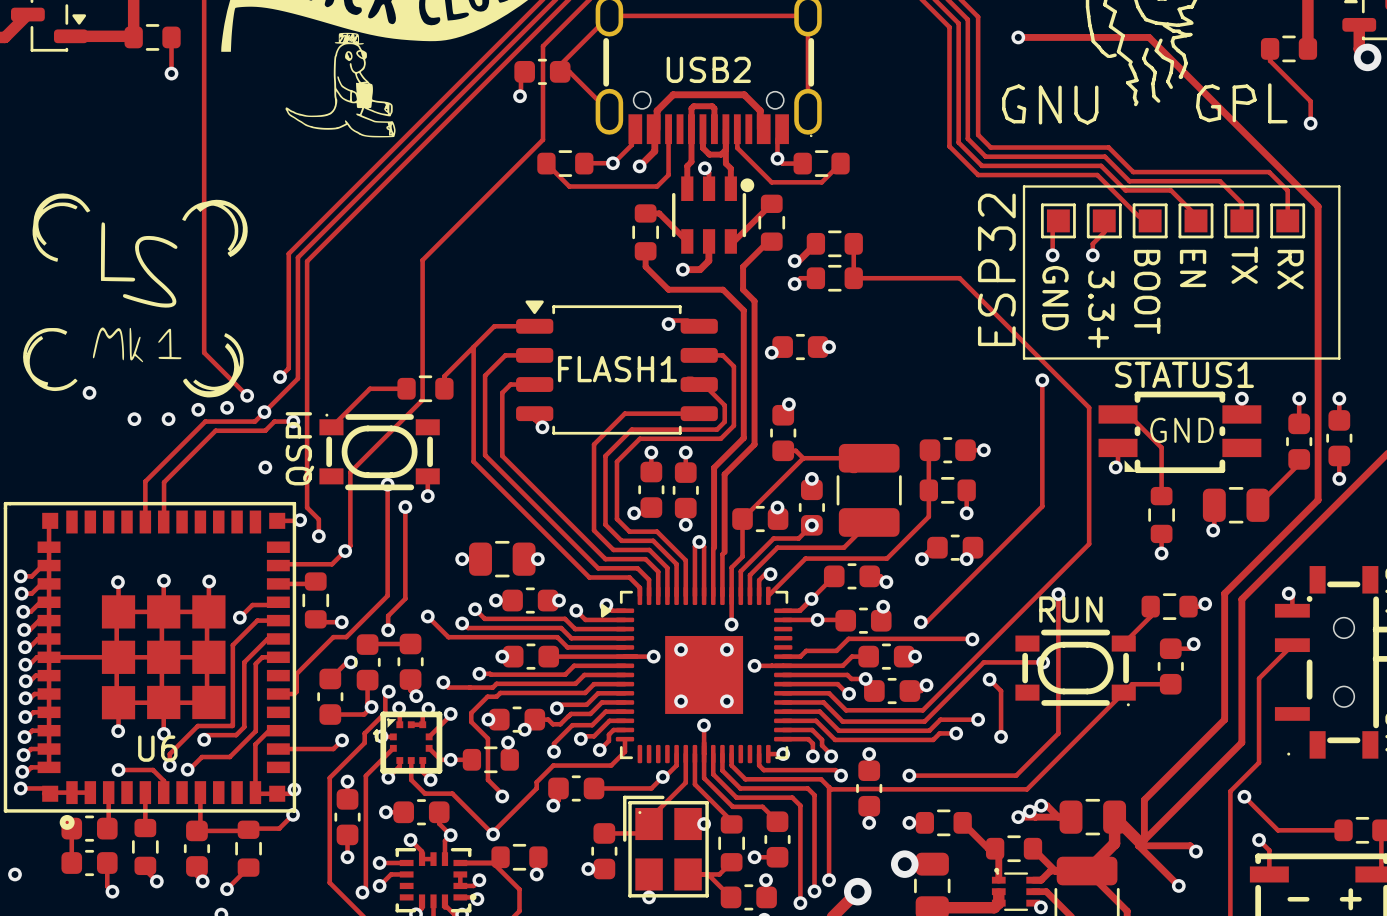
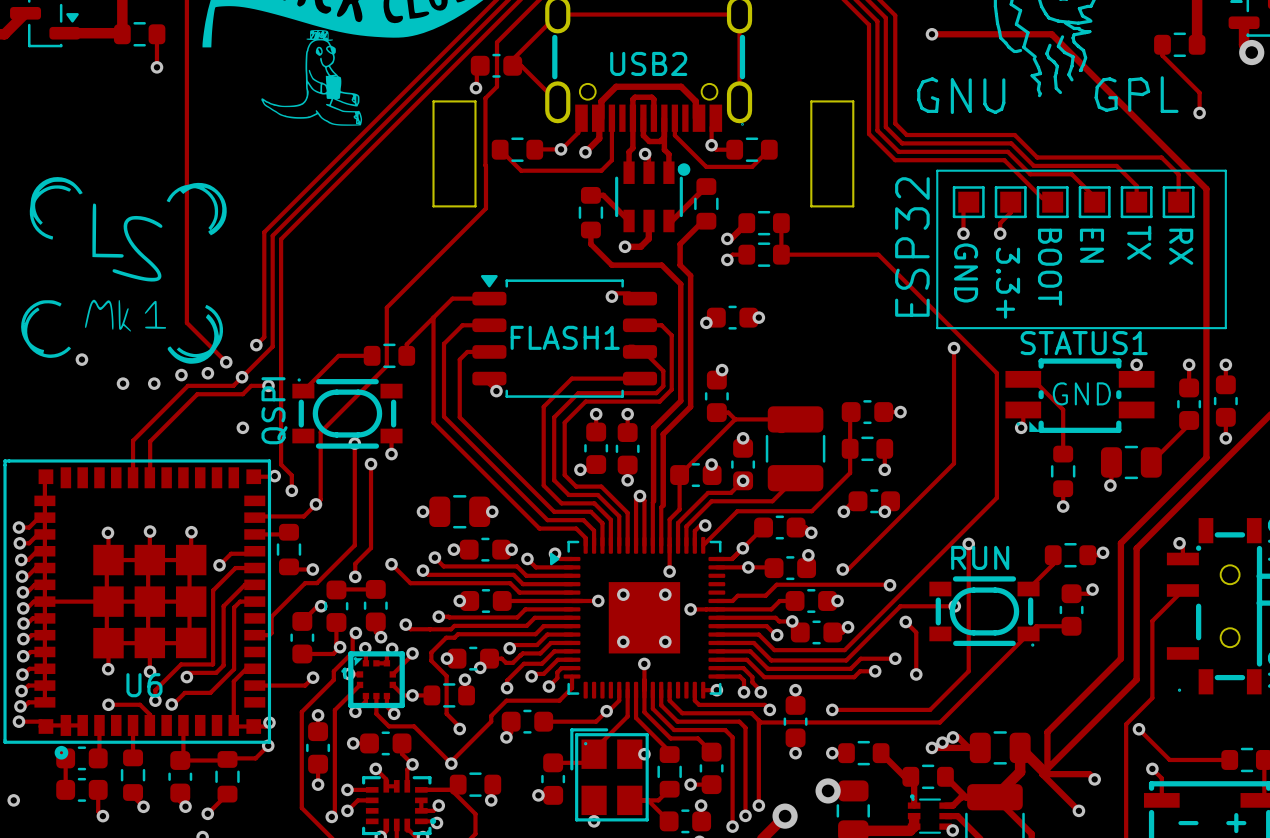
track: (543, 94) (543, 139) (422, 260) (422, 336) -> (497, 86) (485, 98) (485, 208) (386, 307)
board edge: none -> (433, 101) (475, 101) (475, 206) (433, 206) (433, 101)
board edge: none -> (811, 101) (853, 101) (853, 206) (811, 206) (811, 101)

